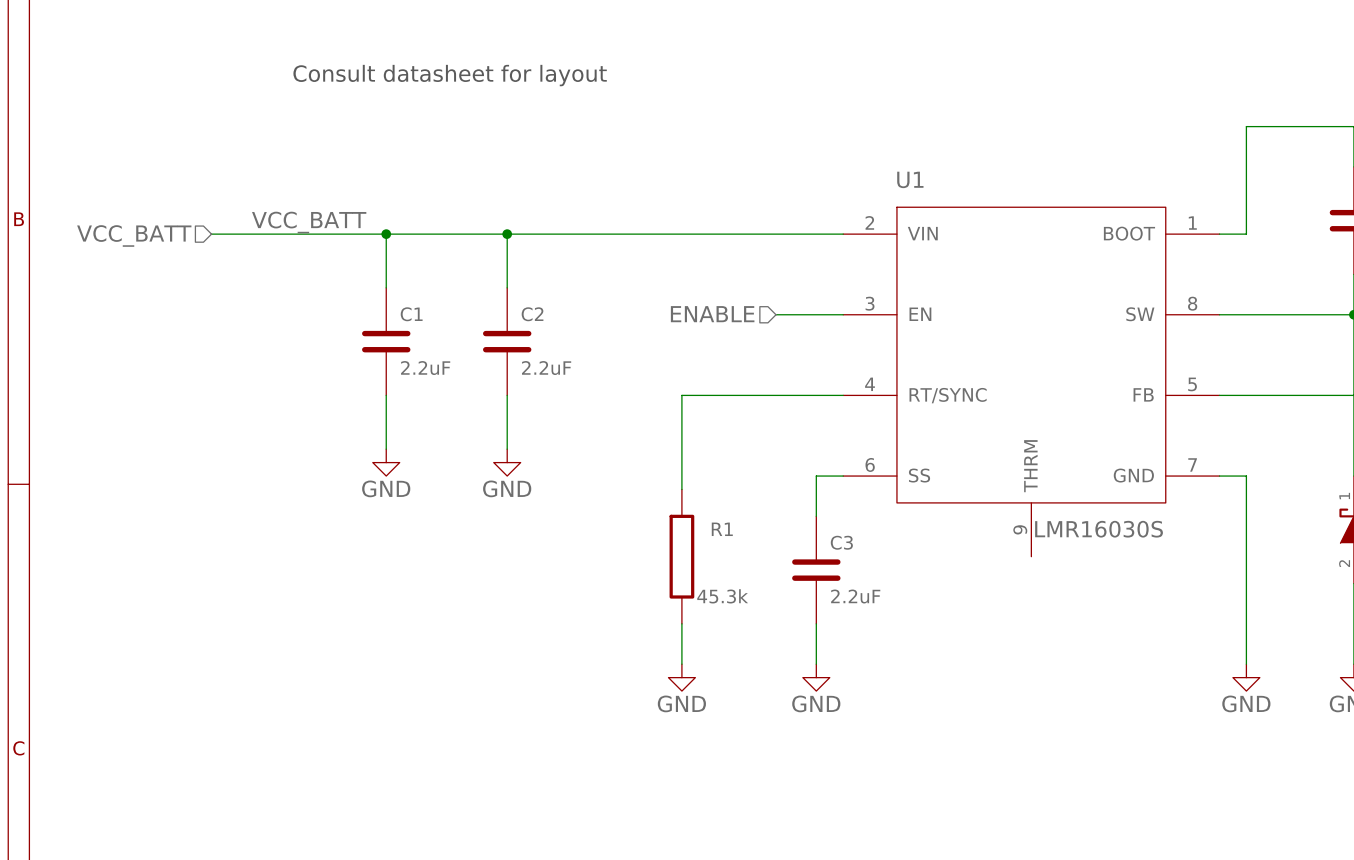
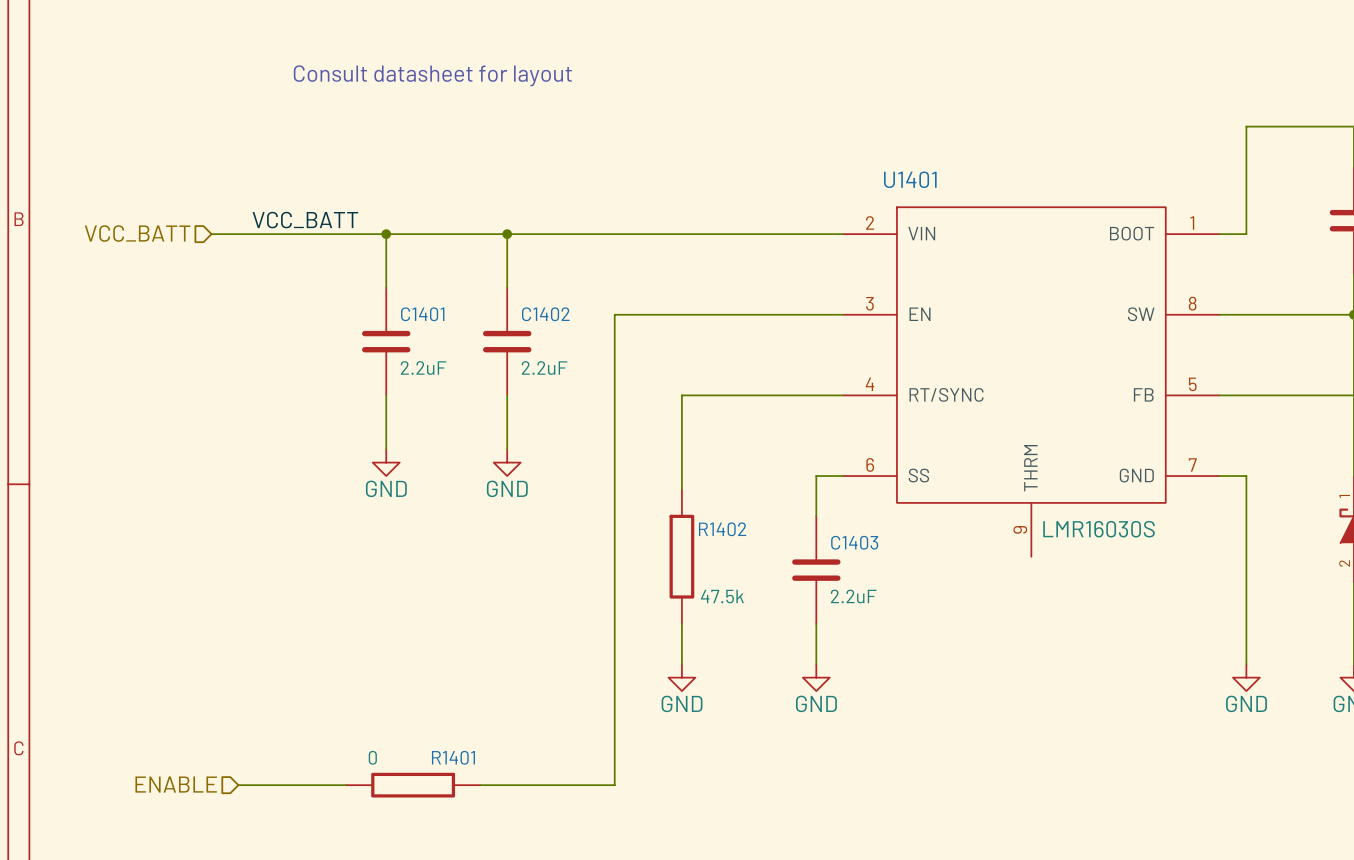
U1 name: U1 (910, 179) -> U1401 (910, 179)
C1 name: C1 (411, 314) -> C1401 (422, 314)
C2 name: C2 (532, 314) -> C1402 (545, 314)
hierarchical label: ENABLE (712, 314) -> none
wire: none -> (776, 314) (614, 314) (614, 785) (480, 785)
R1 name: R1 (722, 529) -> R1402 (722, 529)
C3 name: C3 (841, 542) -> C1403 (854, 542)
R1 value: 45.3k (722, 596) -> 47.5k (722, 596)
hierarchical label: none -> ENABLE (176, 784)
wire: none -> (238, 785) (345, 785)
R1401: none -> 0 (413, 785)

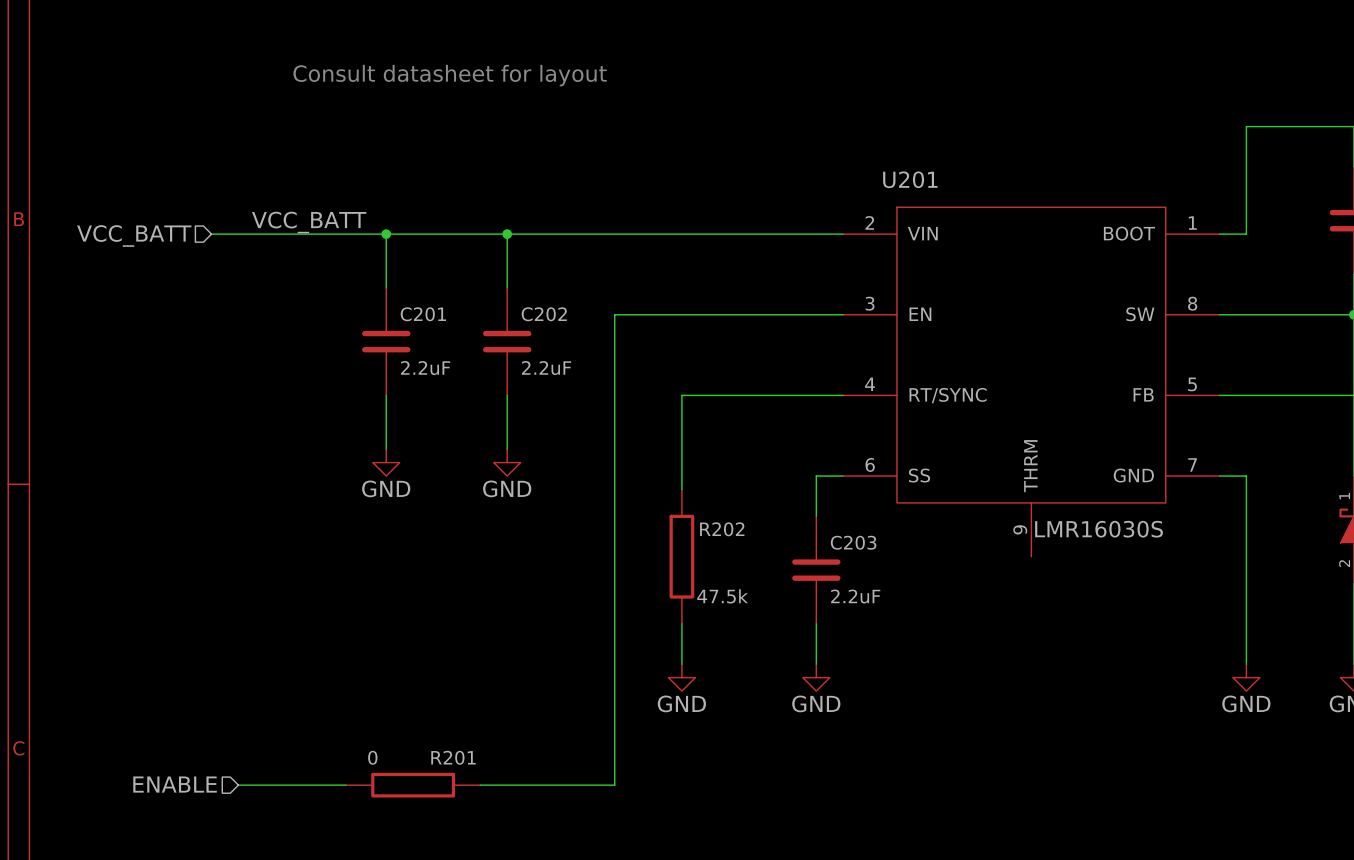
U1401 name: U1401 (910, 179) -> U201 (910, 179)
C1401 name: C1401 (422, 314) -> C201 (423, 314)
C1402 name: C1402 (545, 314) -> C202 (544, 314)
R1402 name: R1402 (722, 529) -> R202 (722, 529)
C1403 name: C1403 (854, 542) -> C203 (853, 542)
R1401 name: R1401 (453, 757) -> R201 (453, 757)

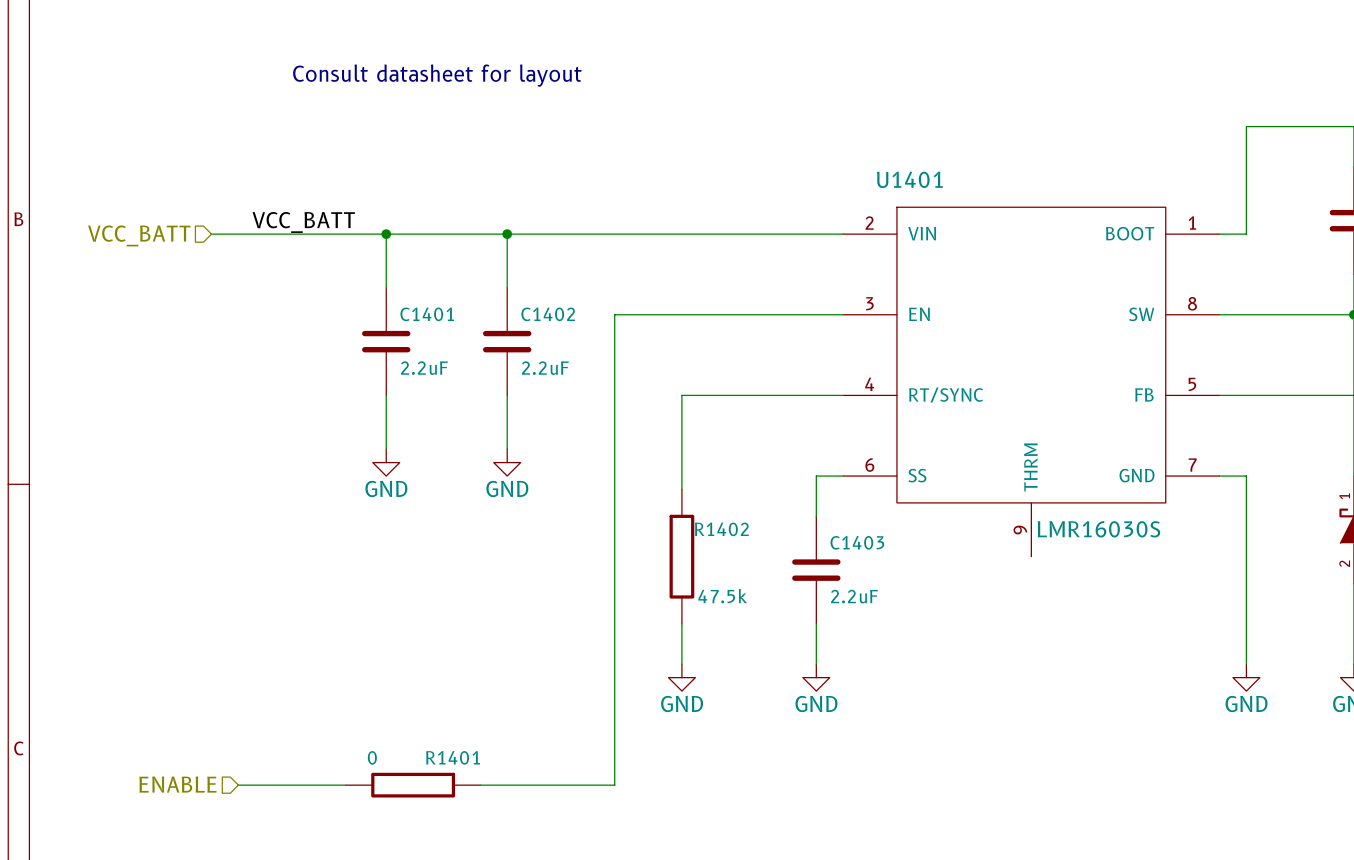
U201 name: U201 (910, 179) -> U1401 (909, 179)
C201 name: C201 (423, 314) -> C1401 (427, 314)
C202 name: C202 (544, 314) -> C1402 (548, 314)
R202 name: R202 (722, 529) -> R1402 (721, 529)
C203 name: C203 (853, 542) -> C1403 (857, 542)
R201 name: R201 (453, 757) -> R1401 (453, 757)

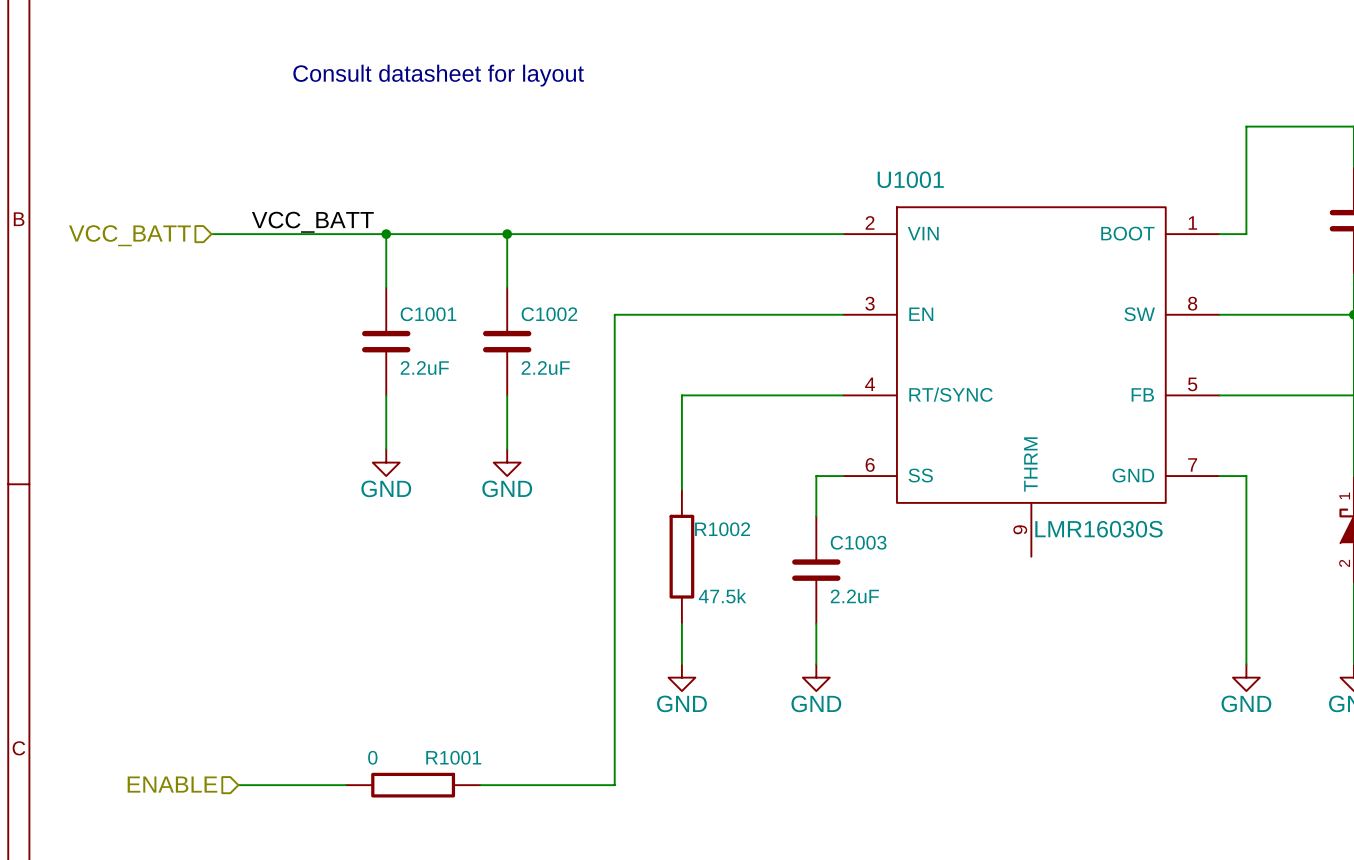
U1401 name: U1401 (909, 179) -> U1001 (910, 179)
C1401 name: C1401 (427, 314) -> C1001 (428, 314)
C1402 name: C1402 (548, 314) -> C1002 (549, 314)
R1402 name: R1402 (721, 529) -> R1002 (722, 529)
C1403 name: C1403 (857, 542) -> C1003 (858, 542)
R1401 name: R1401 (453, 757) -> R1001 (453, 757)

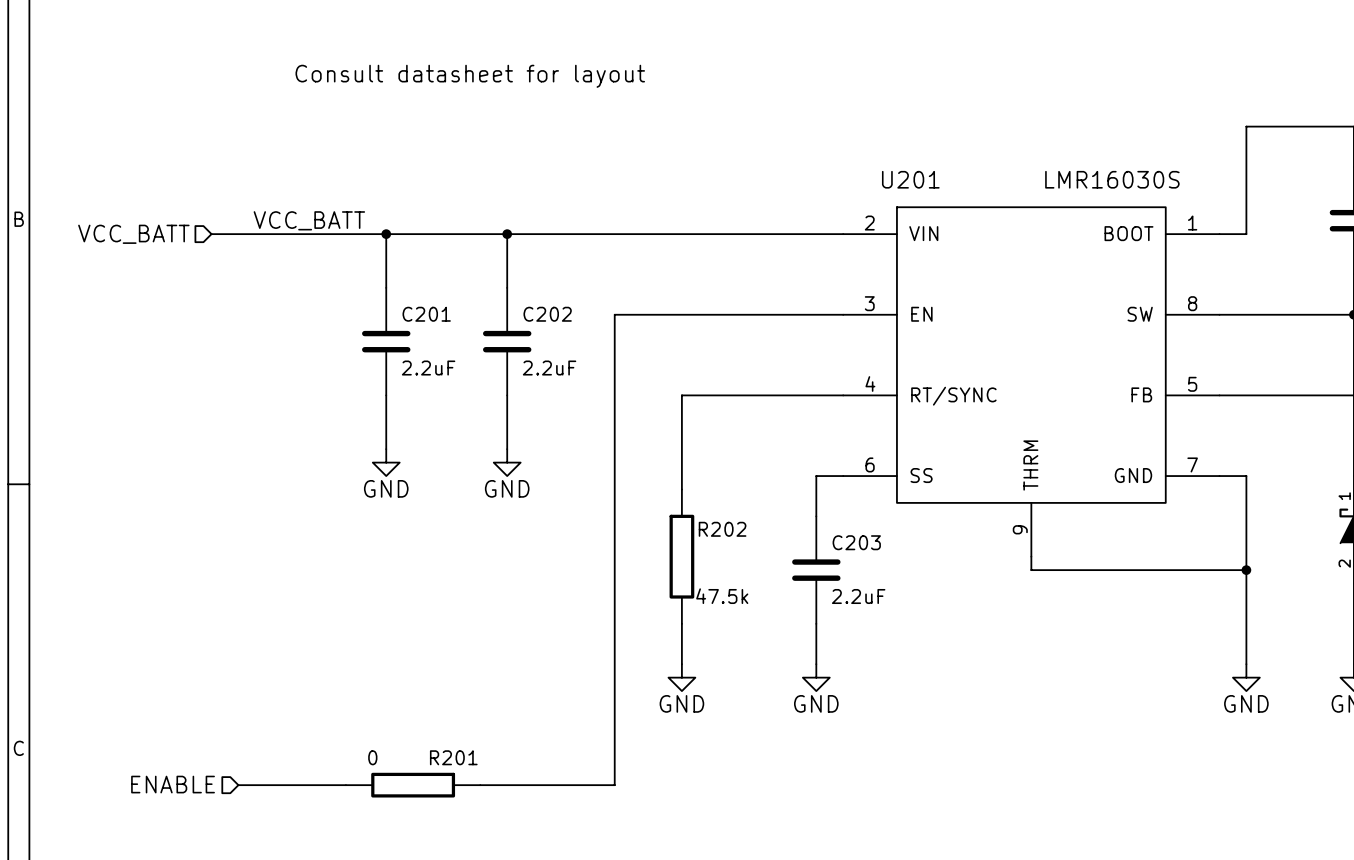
U1001 name: U1001 (910, 179) -> U201 (910, 179)
C1001 name: C1001 (428, 314) -> C201 (426, 314)
C1002 name: C1002 (549, 314) -> C202 (547, 314)
R1002 name: R1002 (722, 529) -> R202 (722, 529)
U1001 value position: LMR16030S (1098, 529) -> LMR16030S (1112, 179)
C1003 name: C1003 (858, 542) -> C203 (856, 542)
wire: none -> (1031, 556) (1031, 570) (1246, 570)
junction: none -> (1246, 570)
R1001 name: R1001 (453, 757) -> R201 (453, 757)

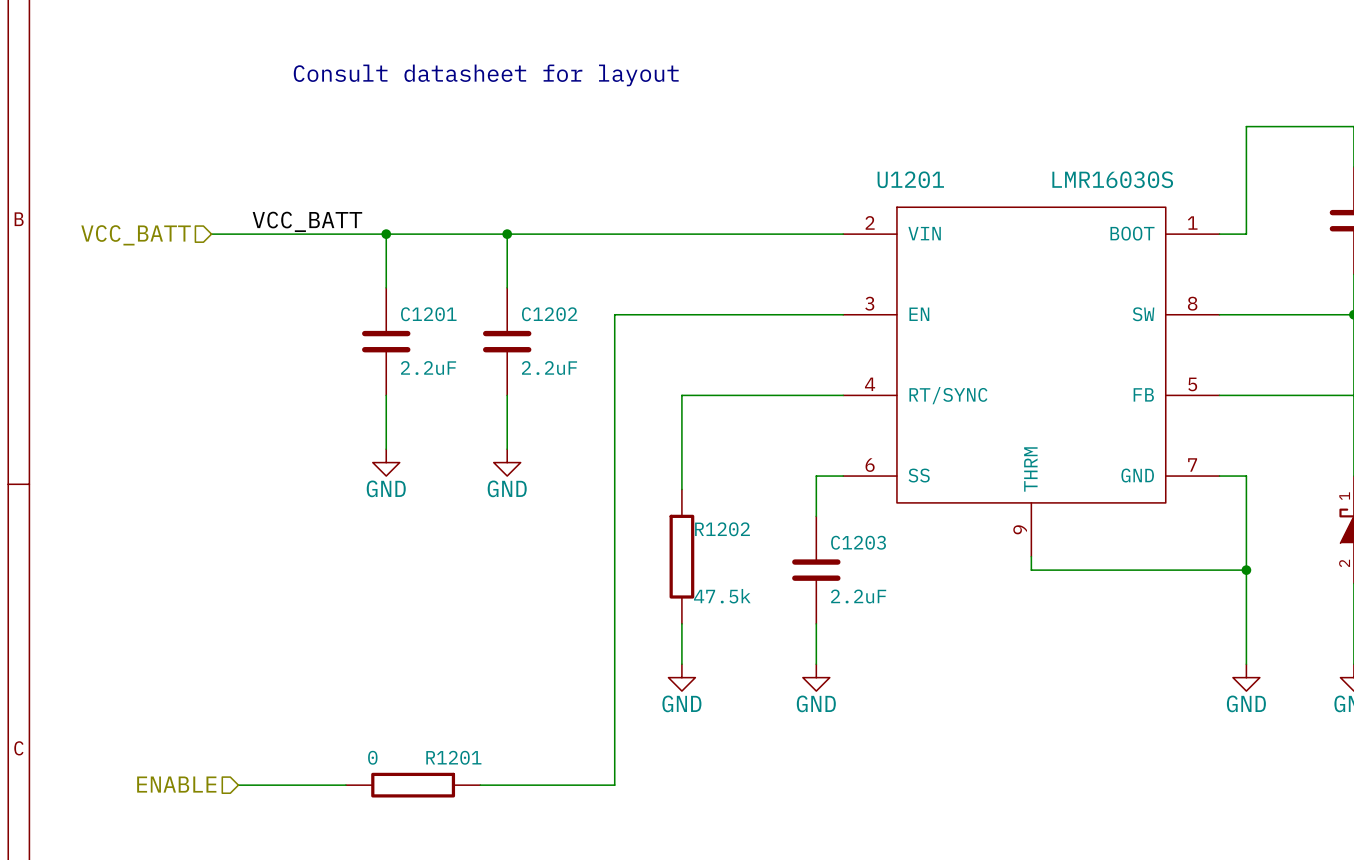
U201 name: U201 (910, 179) -> U1201 (910, 179)
C201 name: C201 (426, 314) -> C1201 (428, 314)
C202 name: C202 (547, 314) -> C1202 (549, 314)
R202 name: R202 (722, 529) -> R1202 (722, 529)
C203 name: C203 (856, 542) -> C1203 (858, 542)
R201 name: R201 (453, 757) -> R1201 (453, 757)

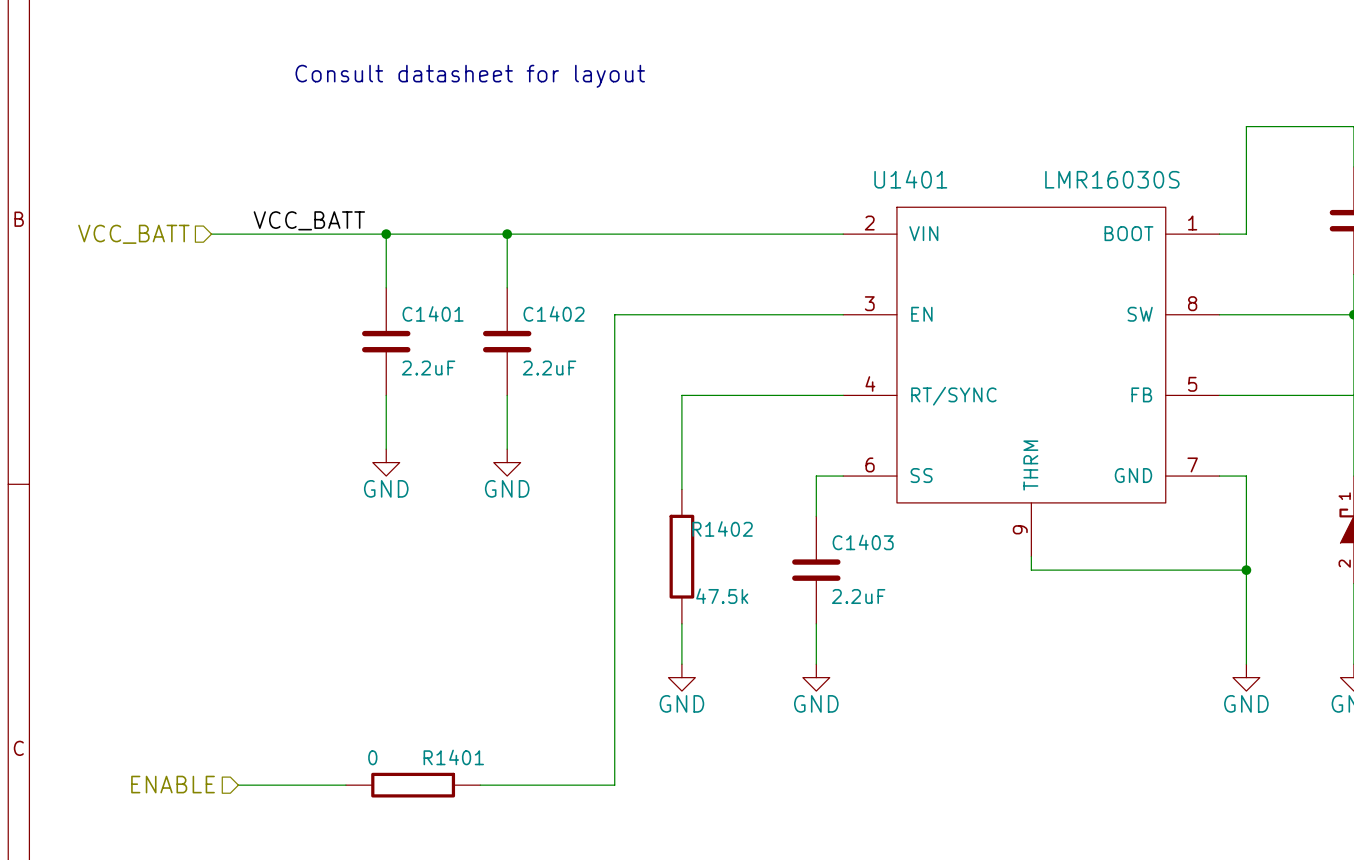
U1201 name: U1201 (910, 179) -> U1401 (910, 179)
C1201 name: C1201 (428, 314) -> C1401 (433, 313)
C1202 name: C1202 (549, 314) -> C1402 (554, 313)
R1202 name: R1202 (722, 529) -> R1402 (722, 528)
C1203 name: C1203 (858, 542) -> C1403 (863, 542)
R1201 name: R1201 (453, 757) -> R1401 (453, 757)

